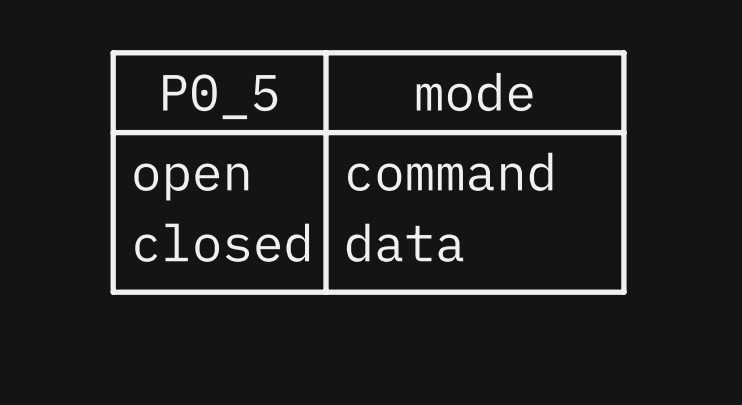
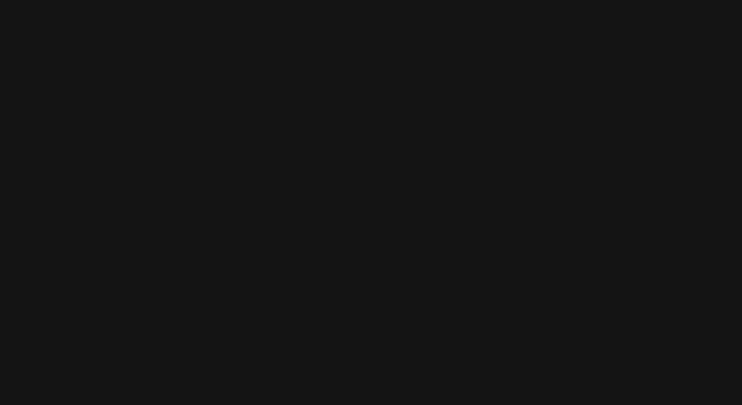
line: (113, 52) (623, 52) (623, 292) (113, 292) (113, 52) -> none
line: (326, 52) (326, 292) -> none
text: mode (474, 92) -> none
text: P0_5 (220, 96) -> none
line: (113, 132) (623, 132) -> none
text: command (450, 171) -> none
text: open (191, 182) -> none
text: closed (222, 242) -> none
text: data (404, 242) -> none

